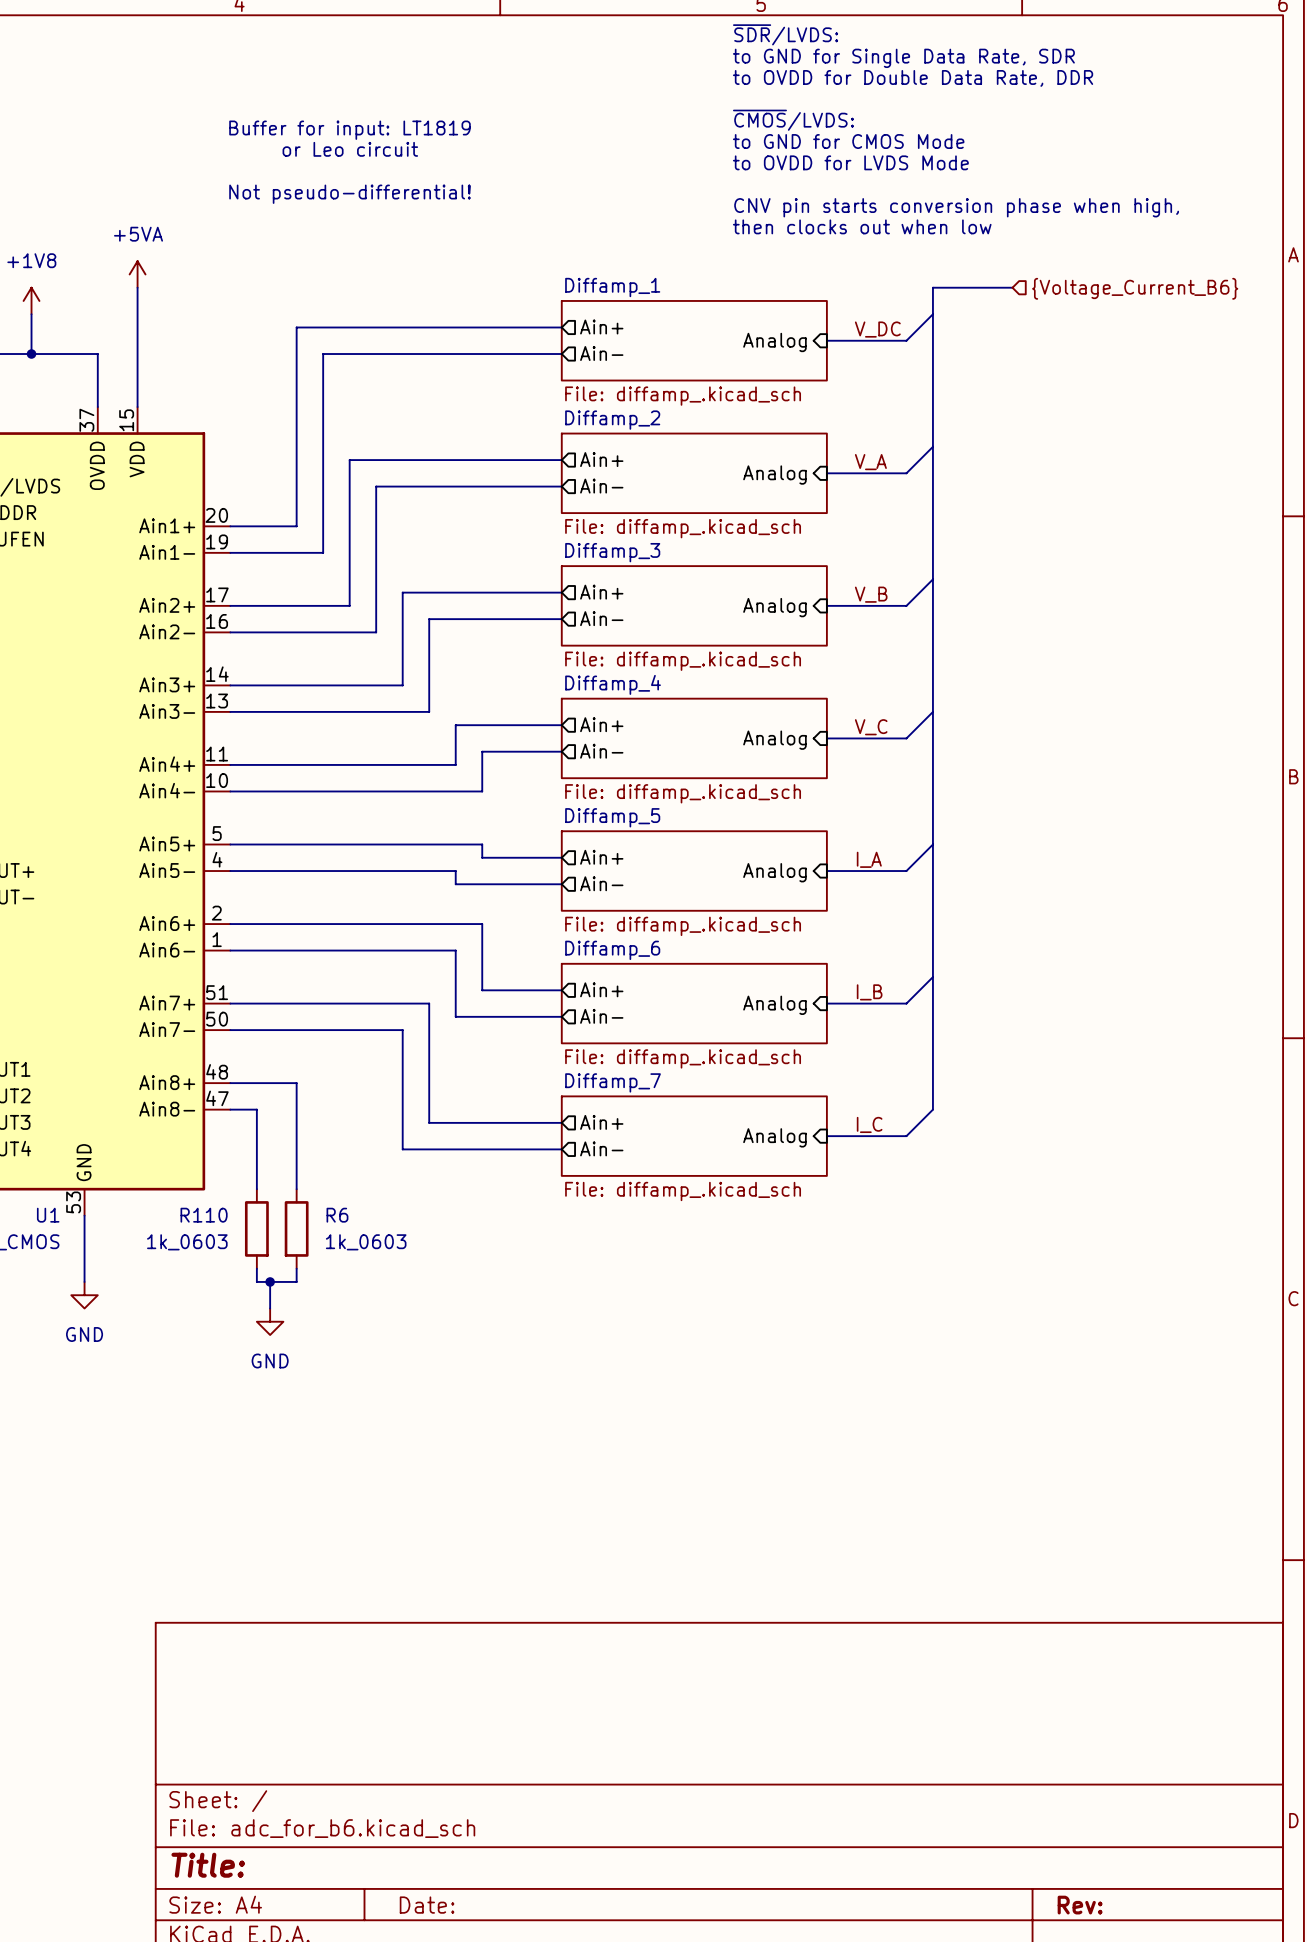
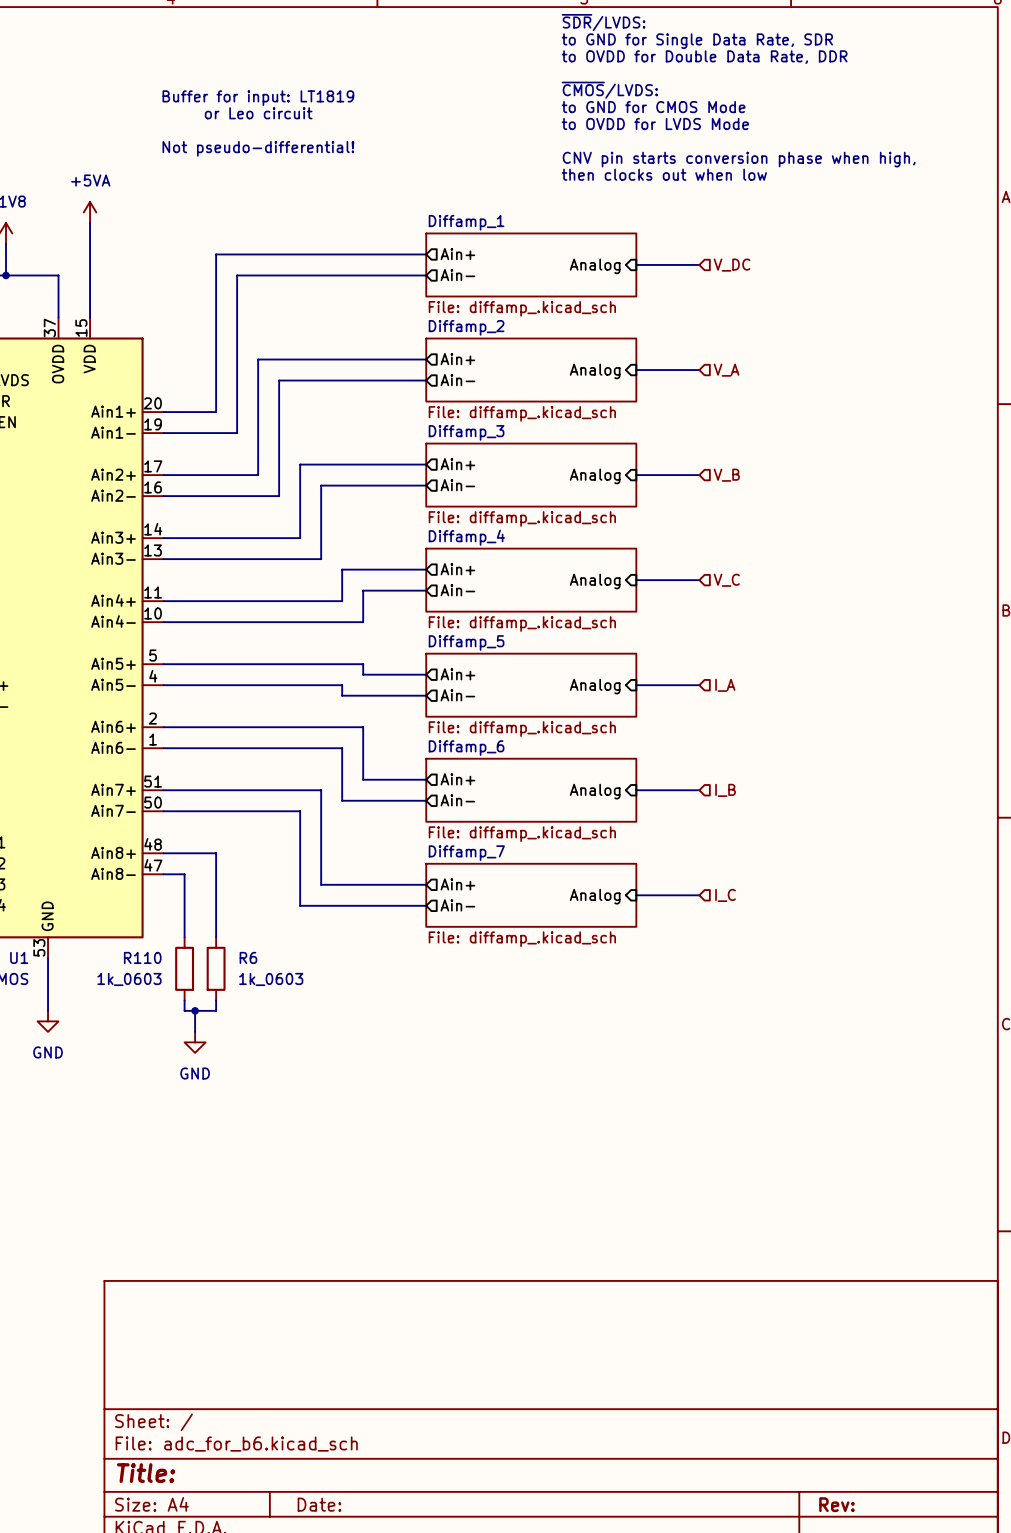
bus: (1012, 287) (932, 287) (932, 1109) -> none
hierarchical label: {Voltage_Current_B6} (1135, 288) -> none
wire: (932, 314) (906, 340) -> none
label: V_DC (877, 329) -> none
hierarchical label: none -> V_DC (732, 265)
wire: (932, 446) (906, 473) -> none
label: V_A (870, 462) -> none
hierarchical label: none -> V_A (726, 370)
wire: (932, 579) (906, 605) -> none
label: V_B (871, 594) -> none
hierarchical label: none -> V_B (726, 475)
wire: (932, 711) (906, 738) -> none
label: V_C (871, 727) -> none
hierarchical label: none -> V_C (726, 580)
wire: (932, 844) (906, 871) -> none
label: I_A (869, 859) -> none
hierarchical label: none -> I_A (725, 685)
wire: (932, 977) (906, 1003) -> none
label: I_B (869, 992) -> none
hierarchical label: none -> I_B (725, 790)
wire: (932, 1109) (906, 1136) -> none
label: I_C (869, 1124) -> none
hierarchical label: none -> I_C (725, 895)

